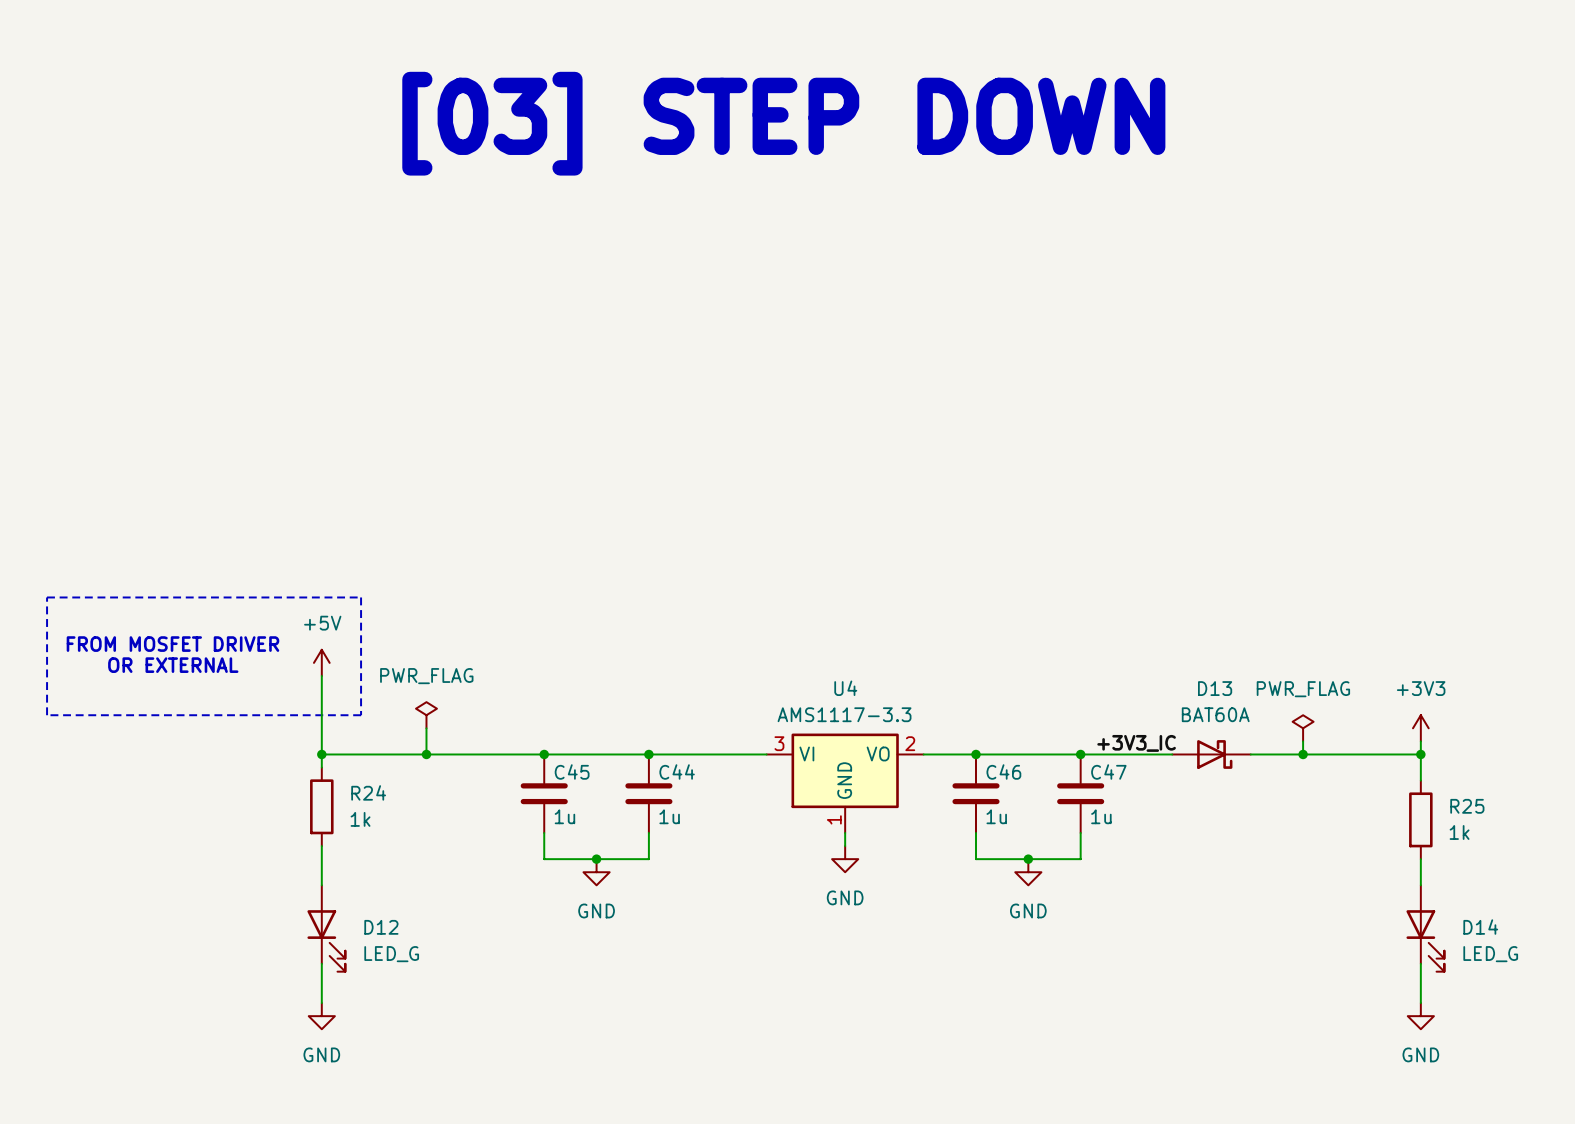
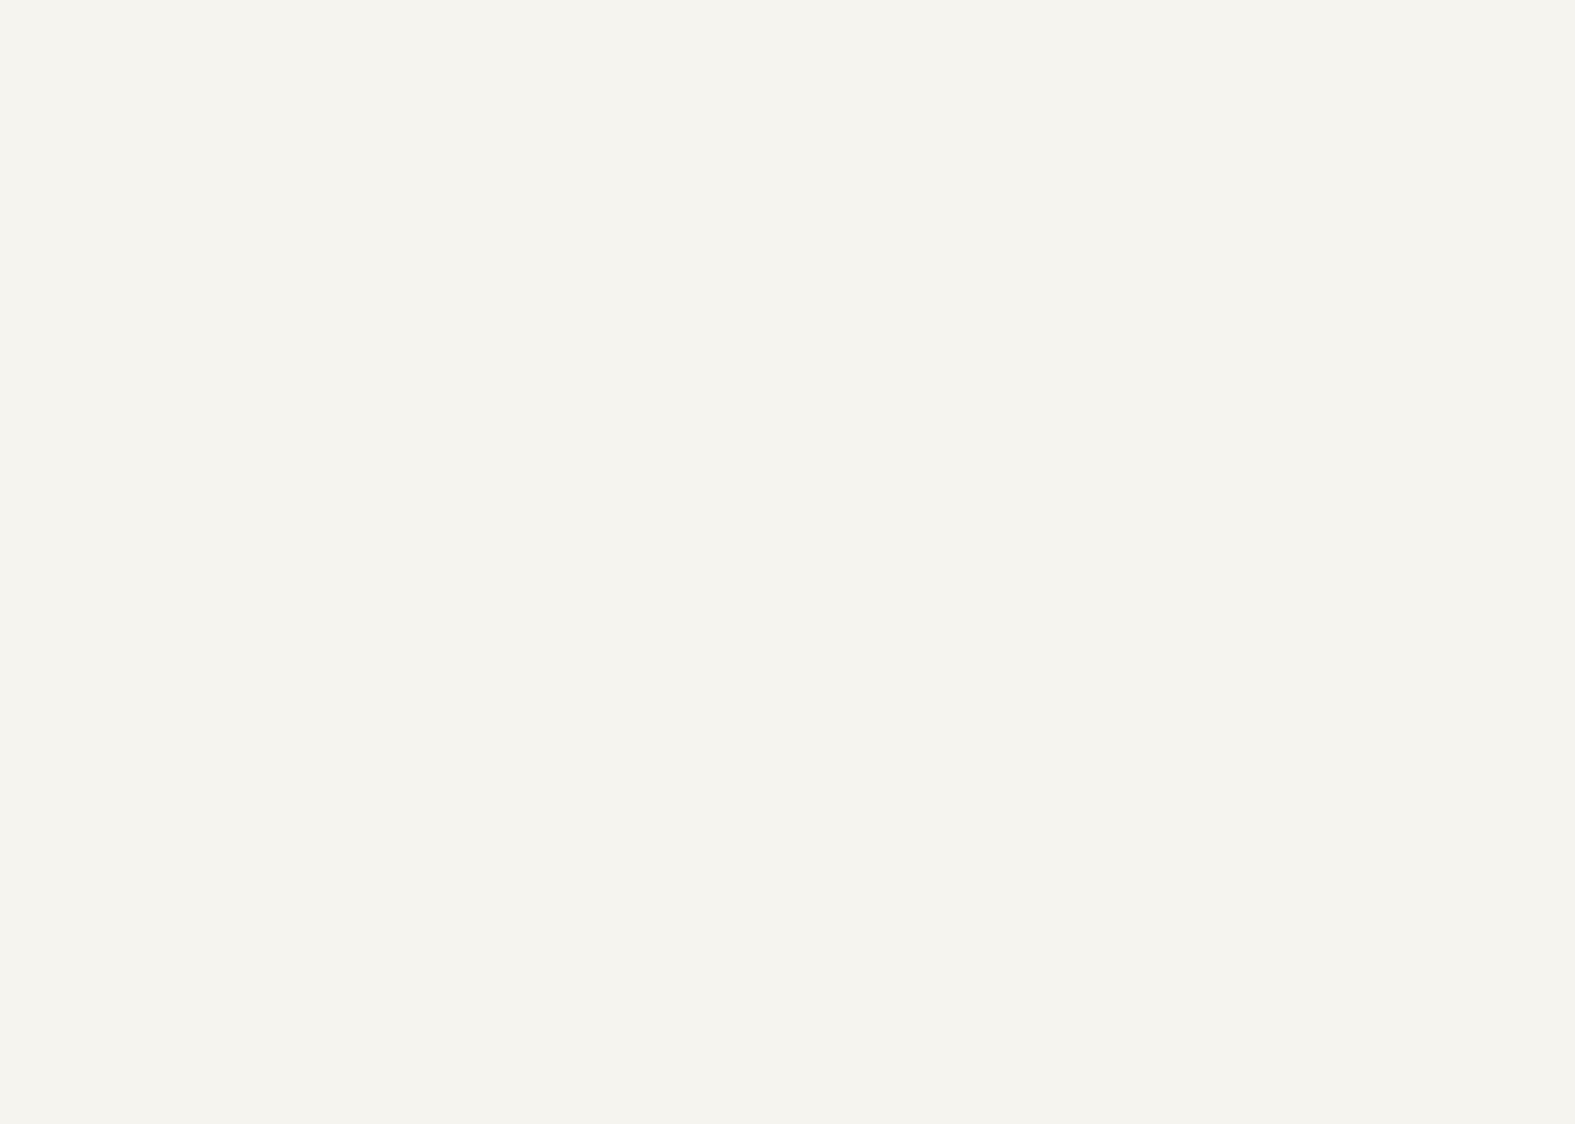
text: [03] STEP DOWN (783, 123) -> none
line: (47, 597) (361, 597) (361, 715) (47, 715) (47, 597) -> none
text: FROM MOSFET DRIVER (172, 644) -> none
power symbol: +5V (321, 662) -> none
text: OR EXTERNAL (173, 665) -> none
wire: (321, 675) (321, 767) -> none
power symbol: PWR_FLAG (426, 715) -> none
wire: (426, 728) (426, 754) -> none
power symbol: PWR_FLAG (1303, 728) -> none
power symbol: +3V3 (1420, 728) -> none
wire: (1303, 741) (1303, 754) -> none
wire: (1420, 741) (1420, 780) -> none
label: +3V3_IC (1136, 743) -> none
wire: (321, 754) (766, 754) -> none
junction: (321, 754) -> none
junction: (426, 754) -> none
junction: (544, 754) -> none
junction: (648, 754) -> none
wire: (923, 754) (1172, 754) -> none
junction: (976, 754) -> none
junction: (1080, 754) -> none
D13: BAT60A (1211, 754) -> none
wire: (1250, 754) (1420, 754) -> none
junction: (1303, 754) -> none
junction: (1420, 754) -> none
U4: AMS1117-3.3 (845, 783) -> none
C45: 1u (544, 793) -> none
C44: 1u (648, 793) -> none
C46: 1u (976, 793) -> none
C47: 1u (1080, 793) -> none
R24: 1k (321, 806) -> none
R25: 1k (1420, 819) -> none
wire: (544, 832) (544, 859) (648, 859) (648, 832) -> none
wire: (845, 832) (845, 846) -> none
wire: (976, 832) (976, 859) (1080, 859) (1080, 832) -> none
wire: (321, 846) (321, 885) -> none
junction: (596, 859) -> none
power symbol: GND (845, 859) -> none
junction: (1028, 859) -> none
wire: (1420, 859) (1420, 885) -> none
power symbol: GND (596, 872) -> none
power symbol: GND (1028, 872) -> none
D12: LED_G (326, 928) -> none
D14: LED_G (1425, 928) -> none
wire: (321, 963) (321, 1003) -> none
wire: (1420, 963) (1420, 1003) -> none
power symbol: GND (321, 1016) -> none
power symbol: GND (1420, 1016) -> none

